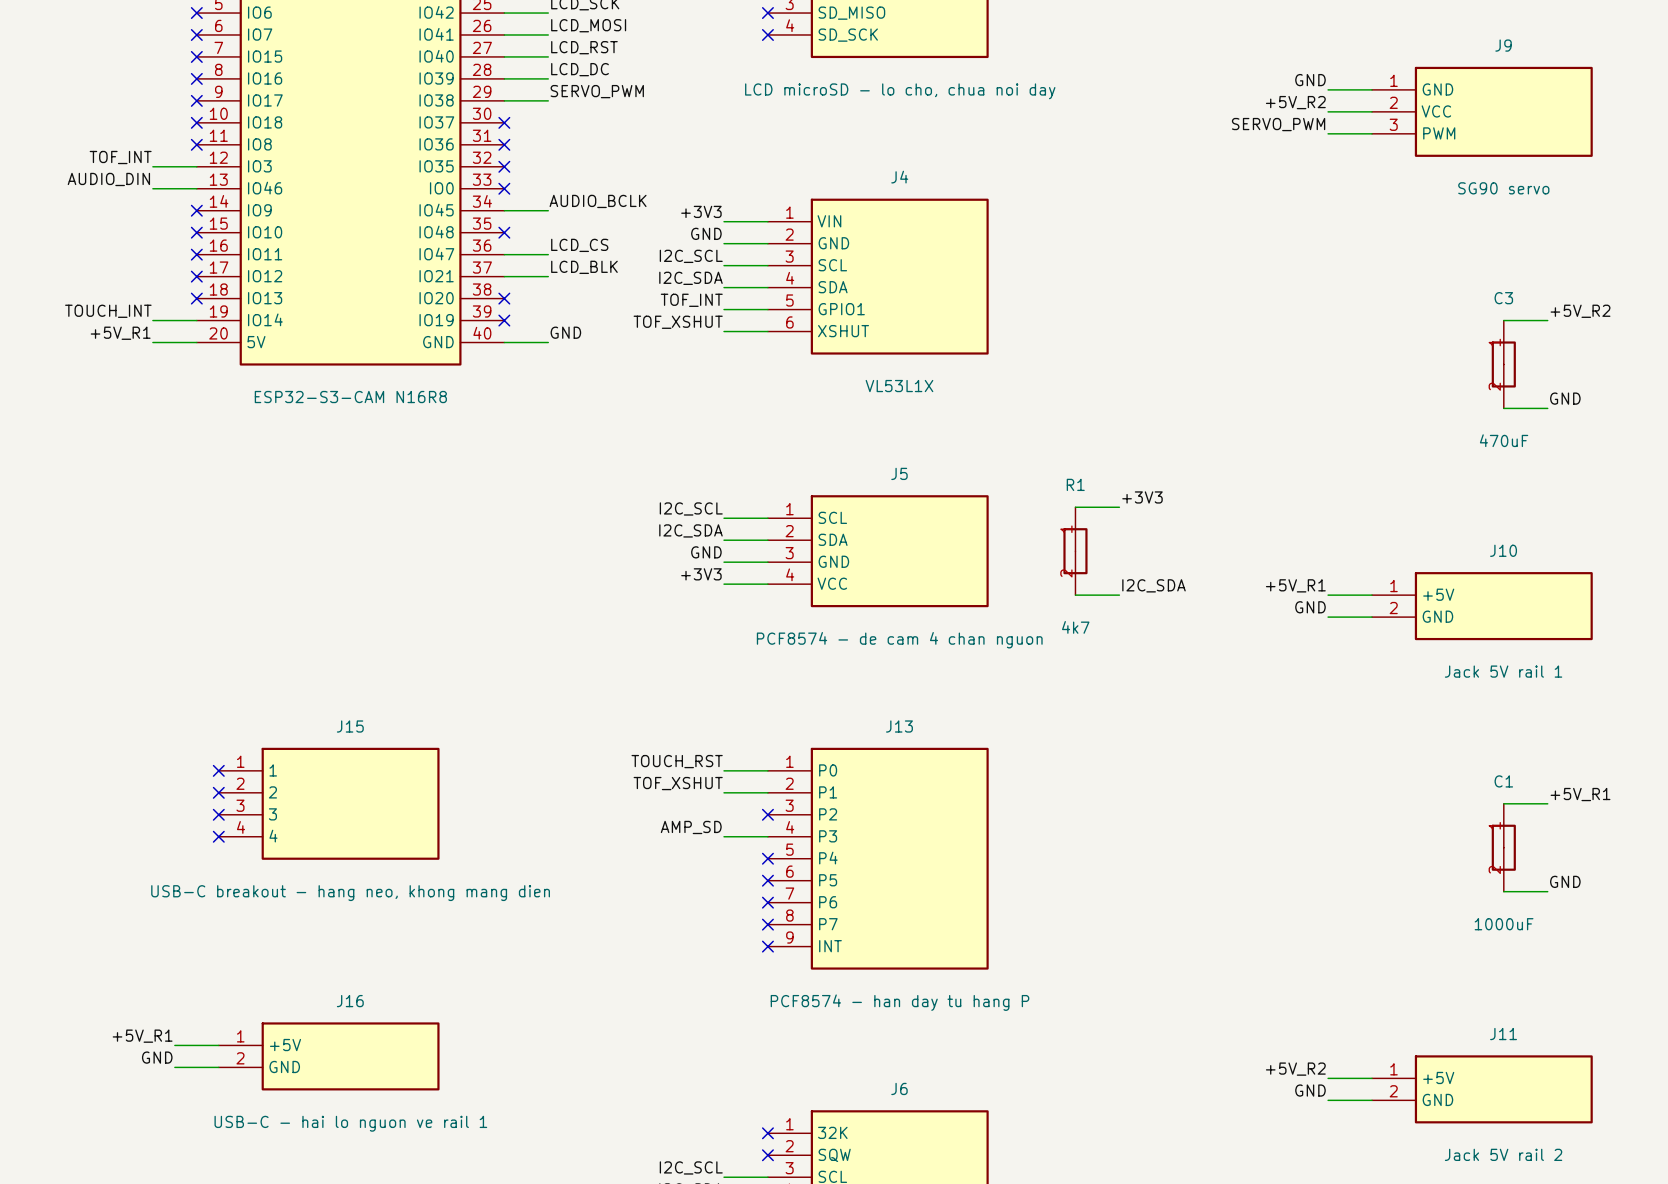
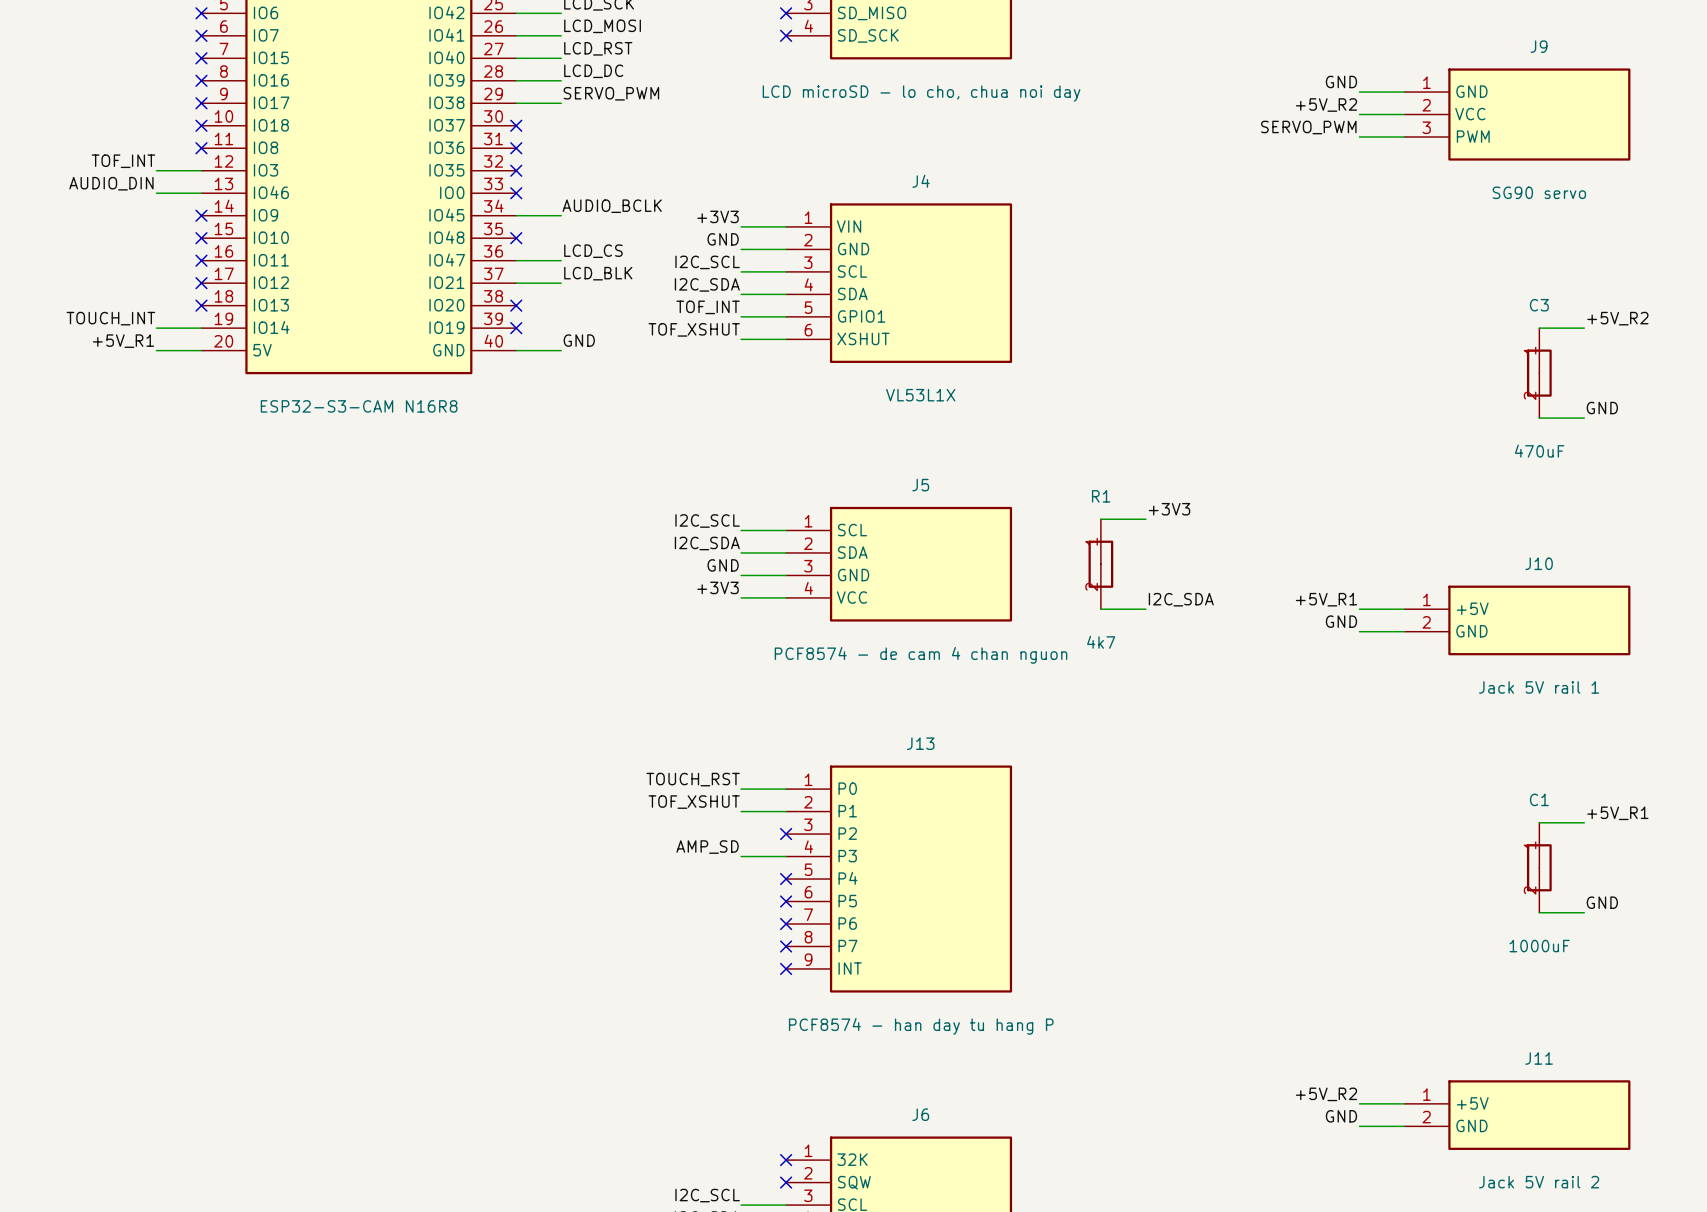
no-connect mark: (218, 770) -> none
no-connect mark: (218, 792) -> none
J15: USB-C breakout - hang neo, khong mang dien (329, 803) -> none
no-connect mark: (218, 814) -> none
no-connect mark: (218, 836) -> none
label: +5V_R1 (142, 1036) -> none
wire: (174, 1045) (218, 1045) -> none
J16: USB-C - hai lo nguon ve rail 1 (329, 1056) -> none
label: GND (157, 1057) -> none
wire: (174, 1067) (218, 1067) -> none

